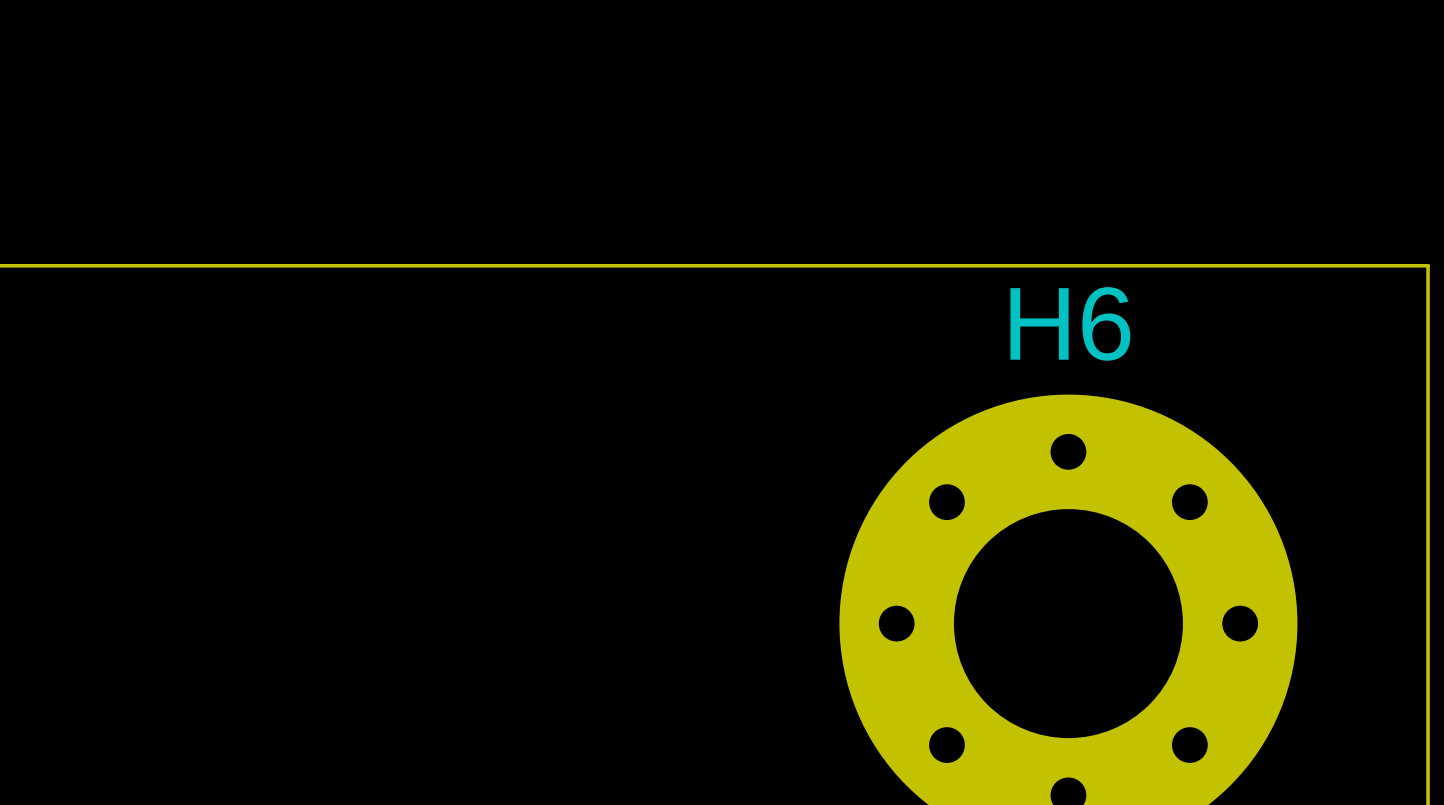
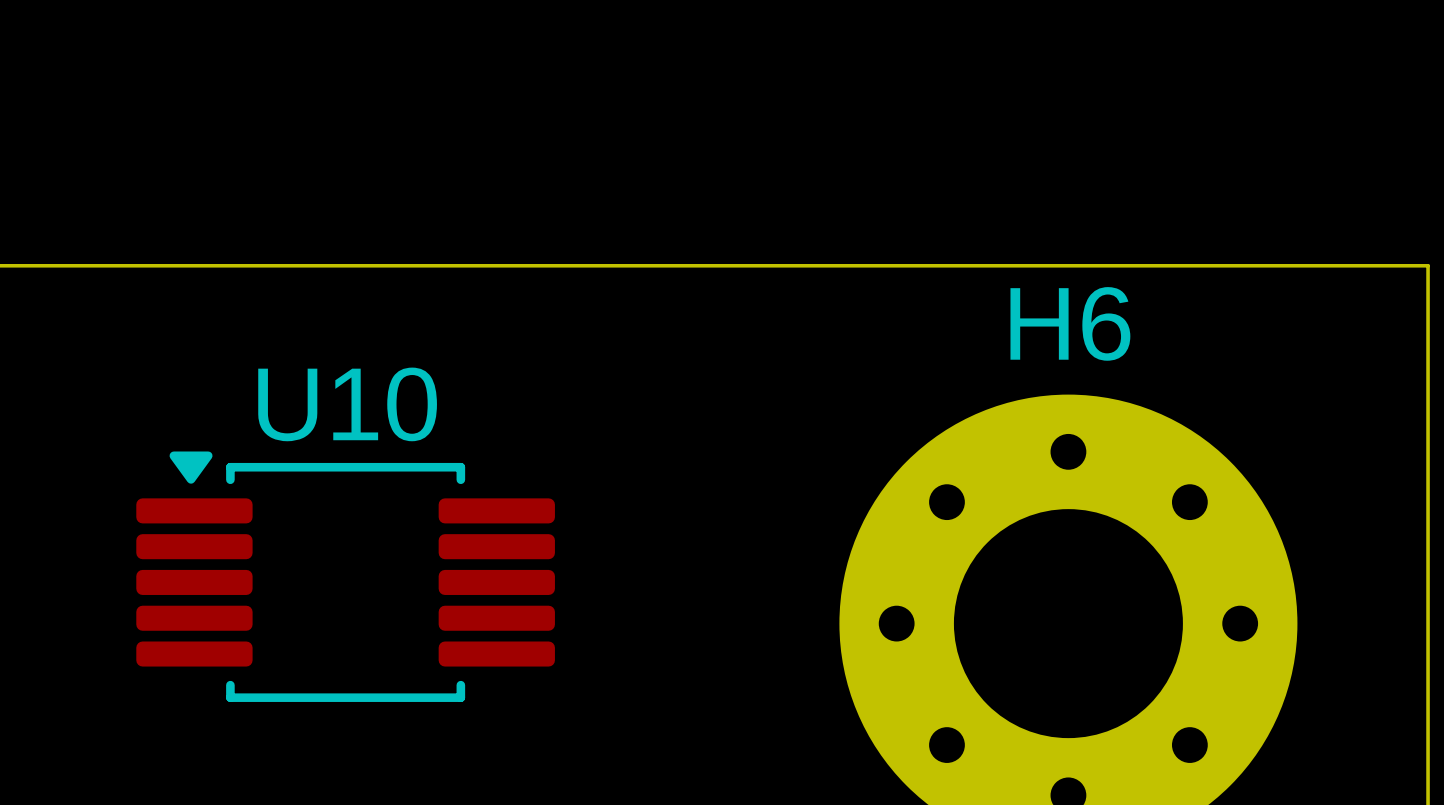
U10: none -> (345, 576)

